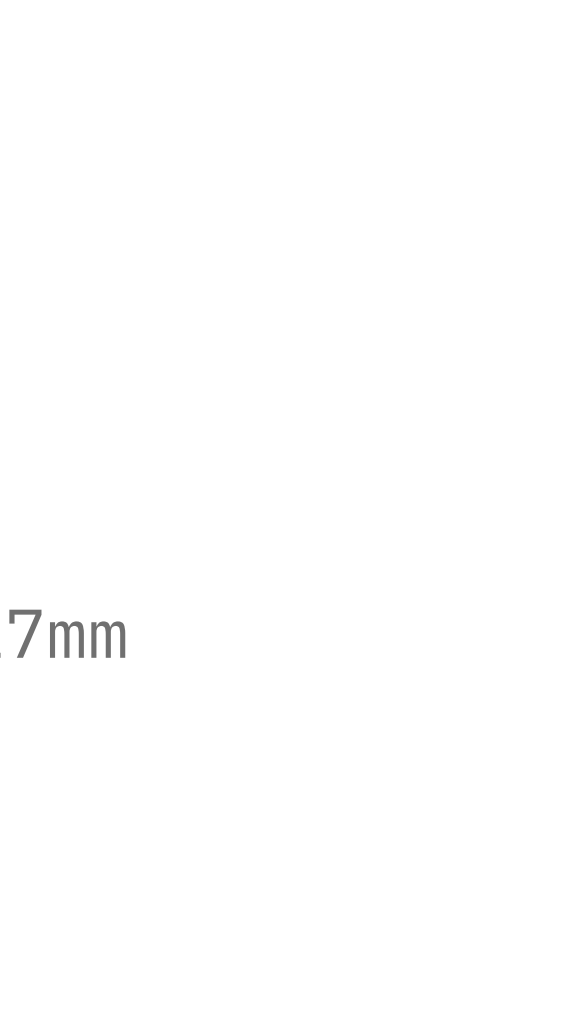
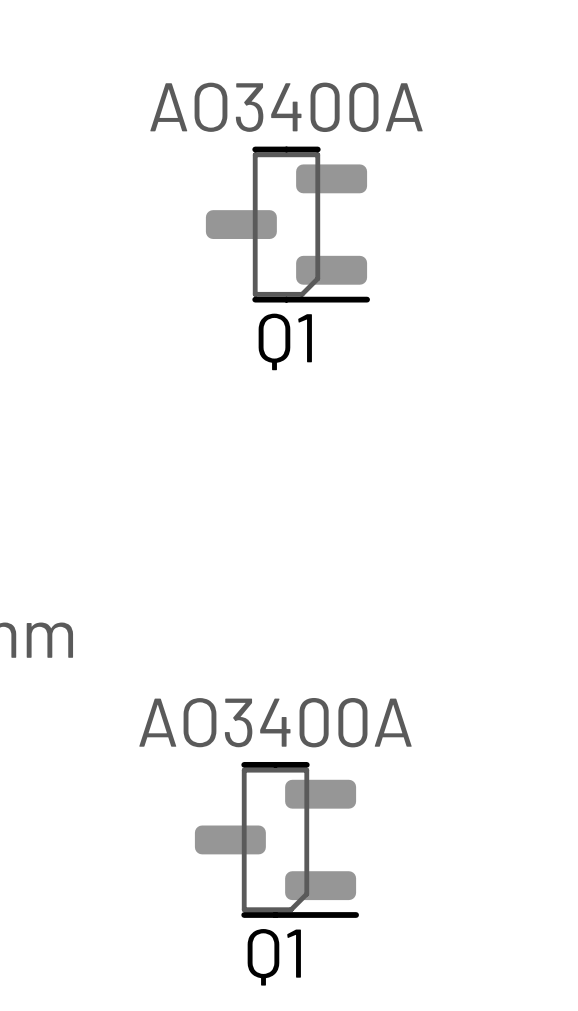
Q1: none -> AO3400A (287, 224)
Q1: none -> AO3400A (276, 839)

